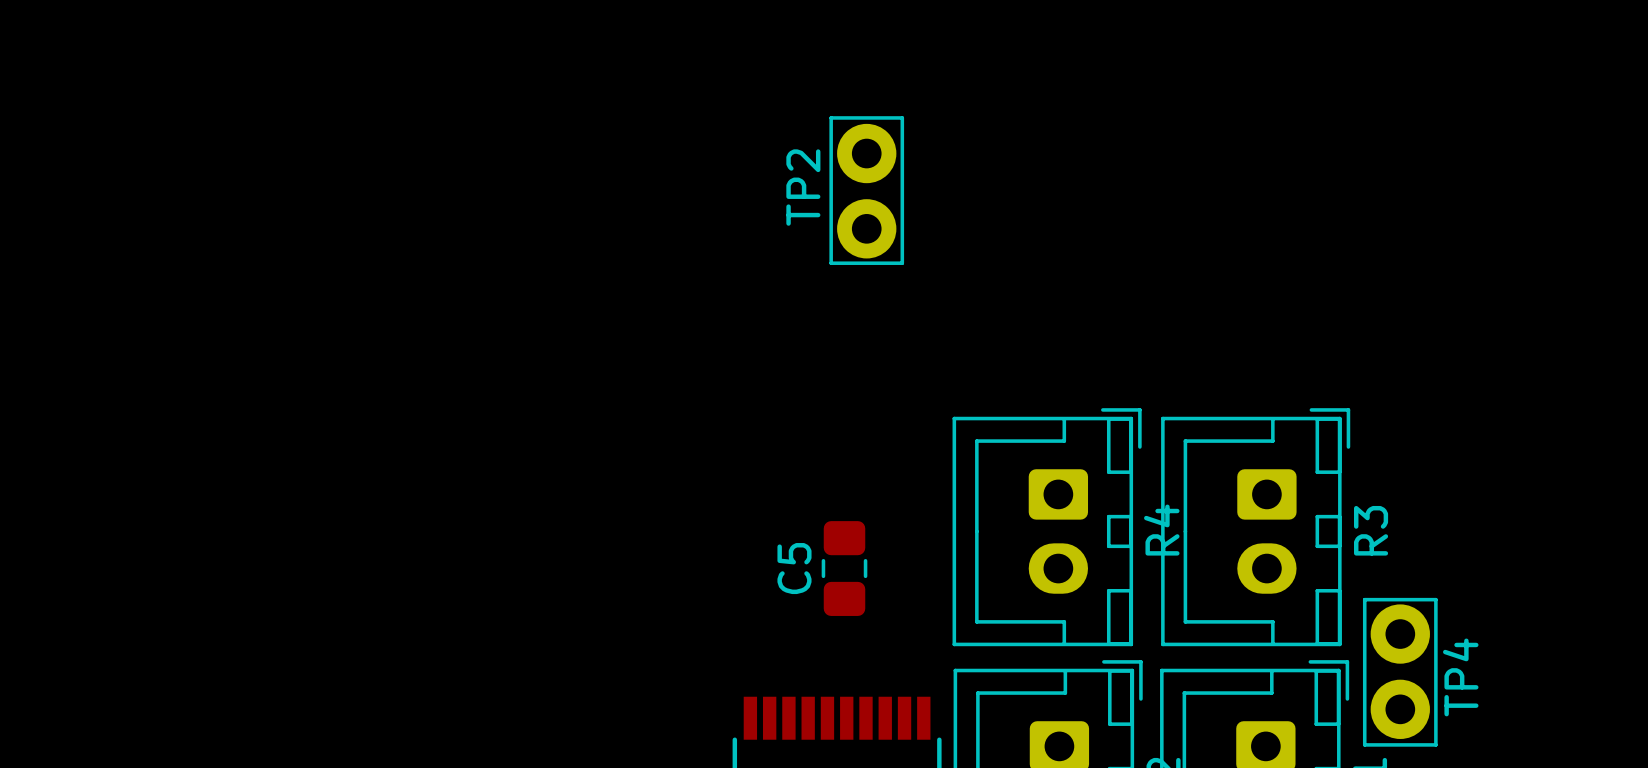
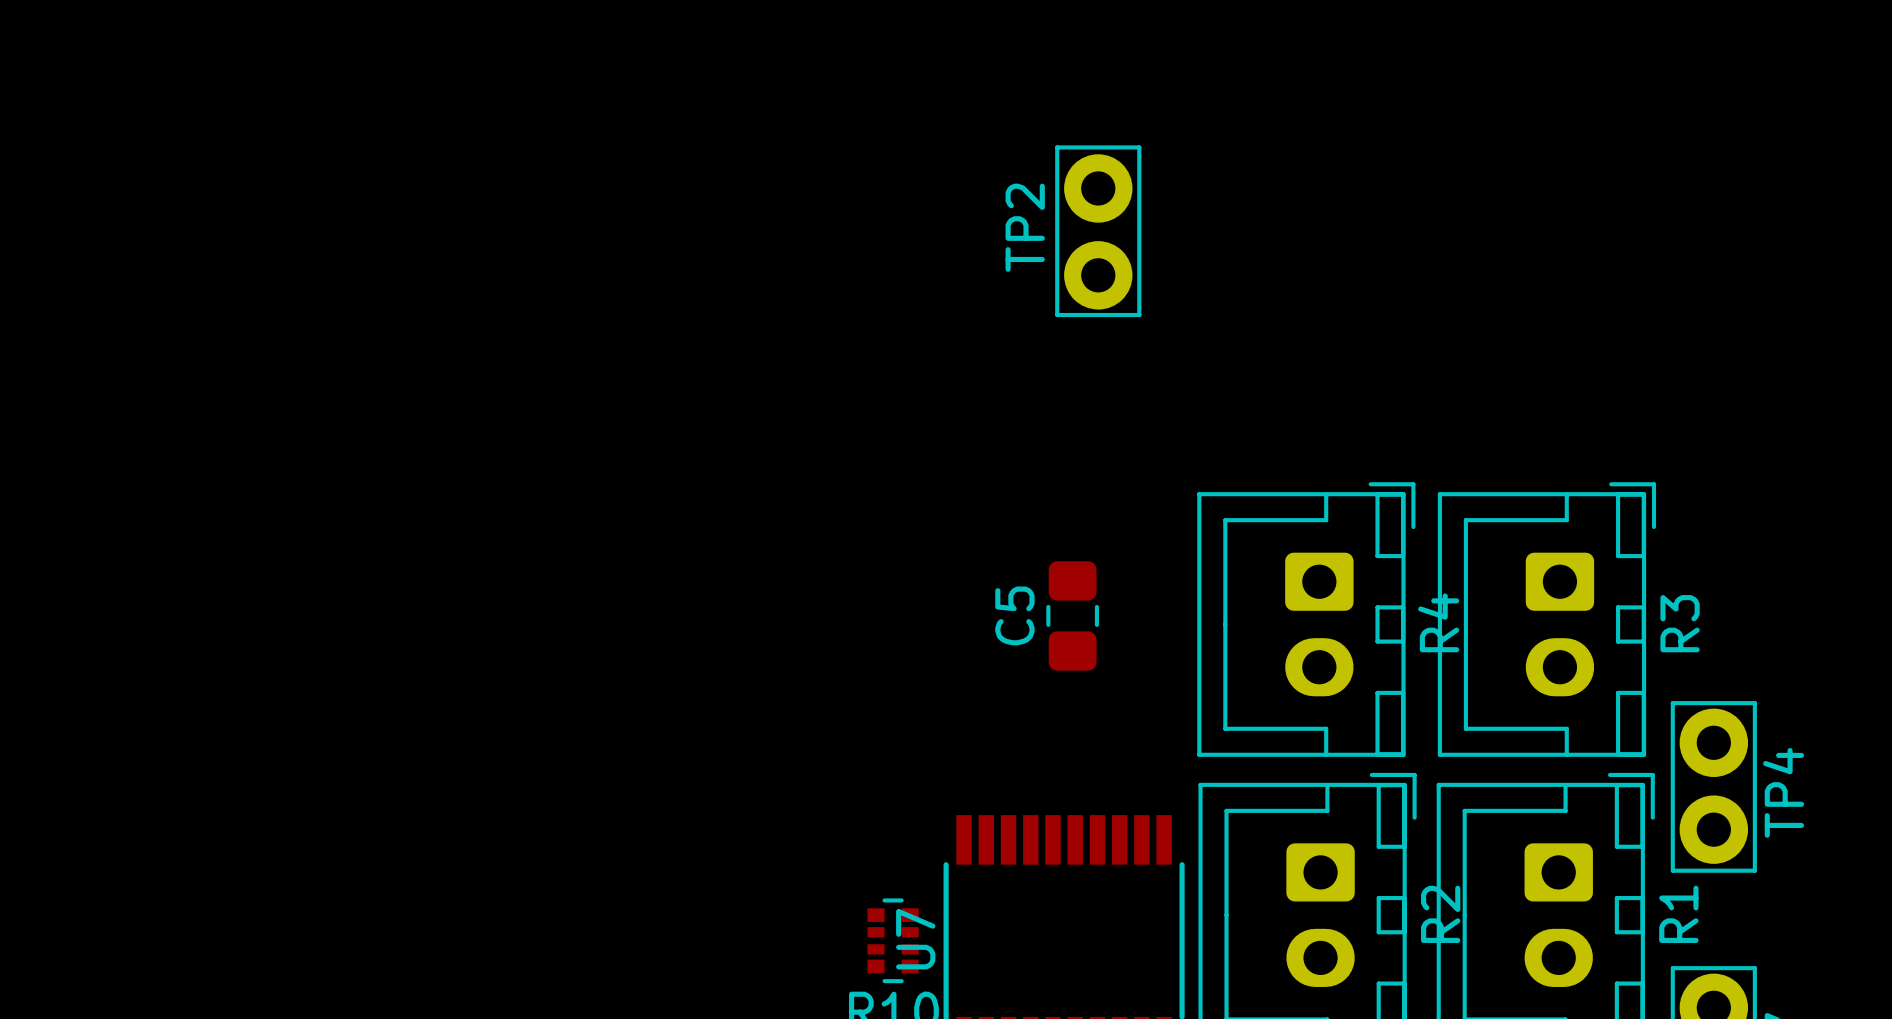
C5 position: (844, 568) -> (1072, 615)

